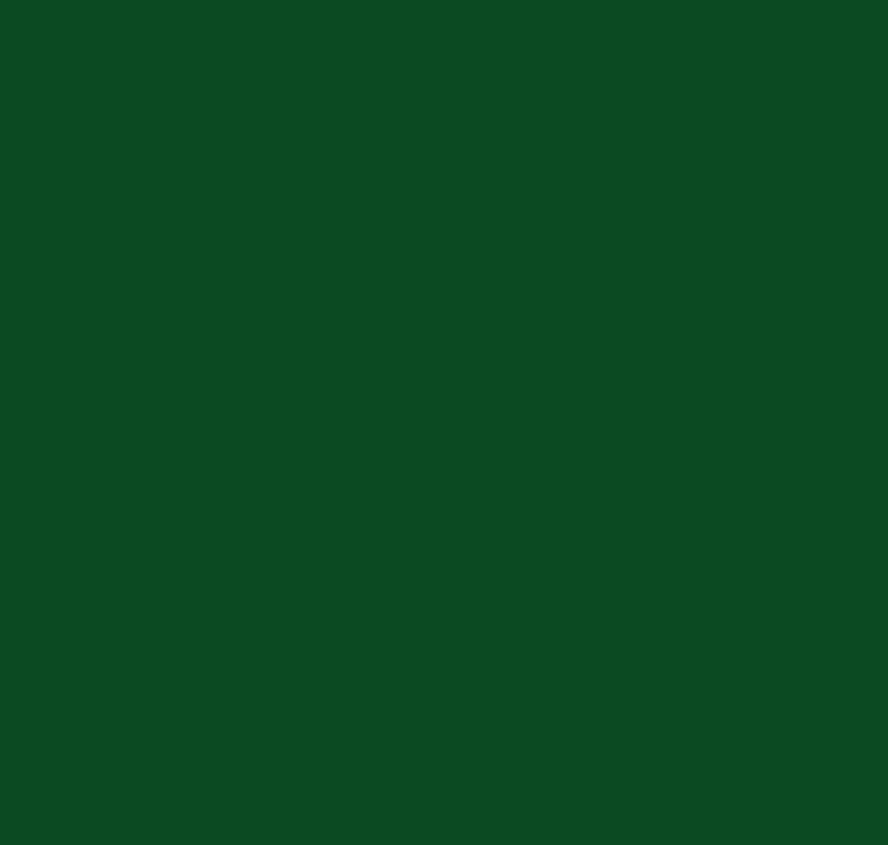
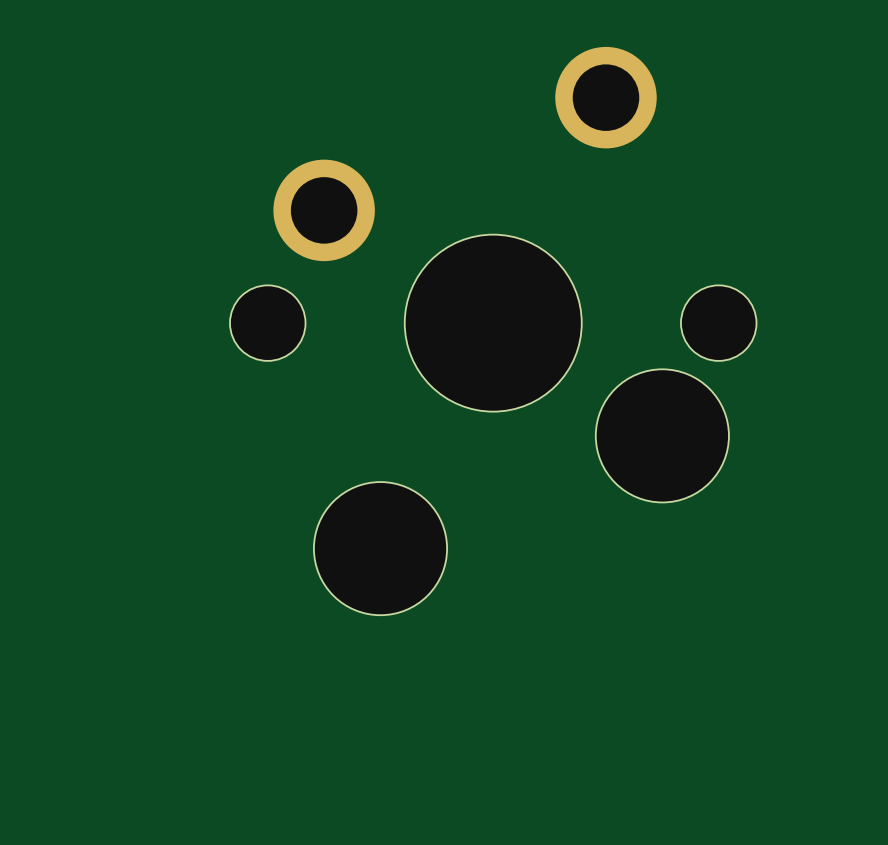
part: none -> (493, 331)

